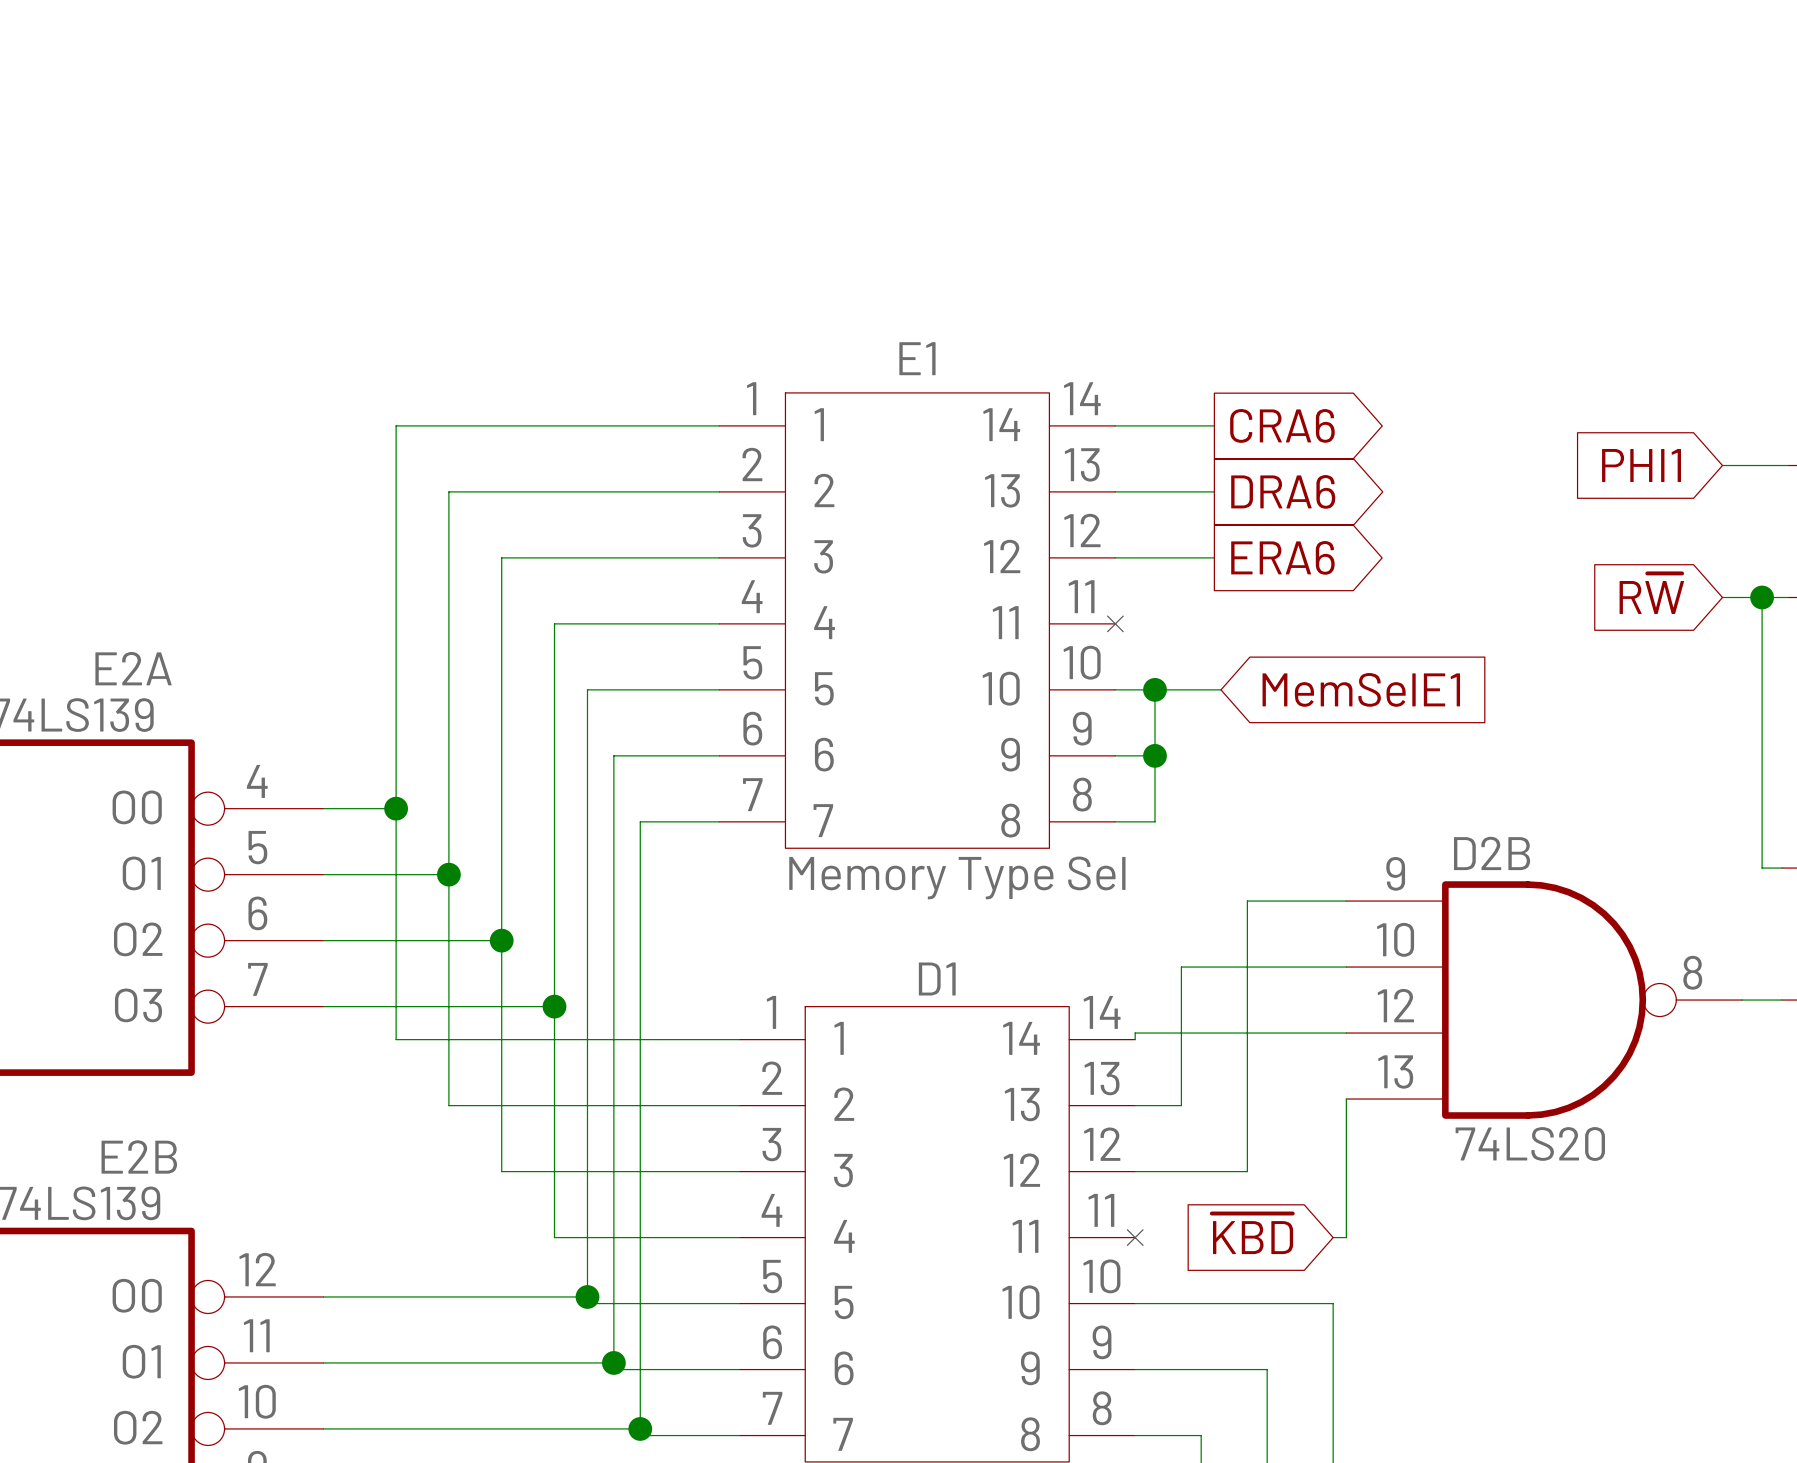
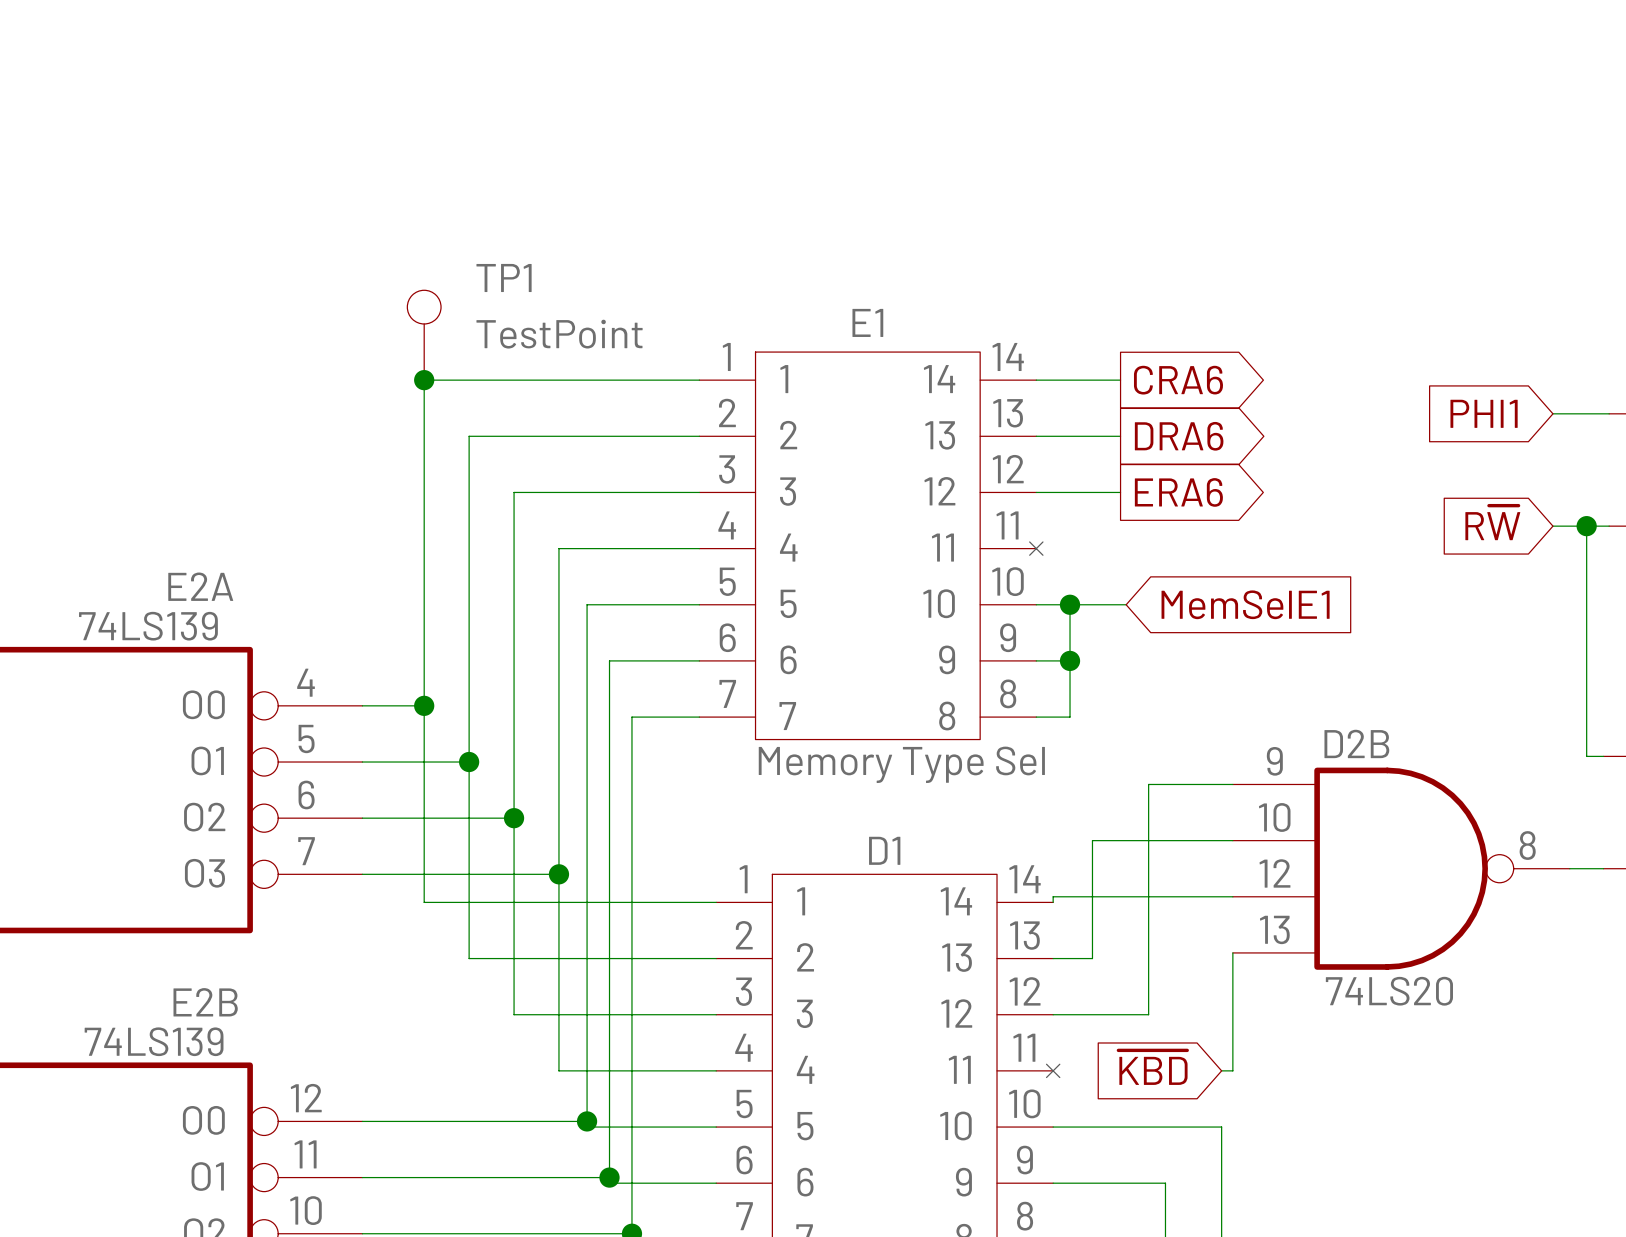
TP1: none -> TestPoint (424, 335)
junction: none -> (424, 380)

